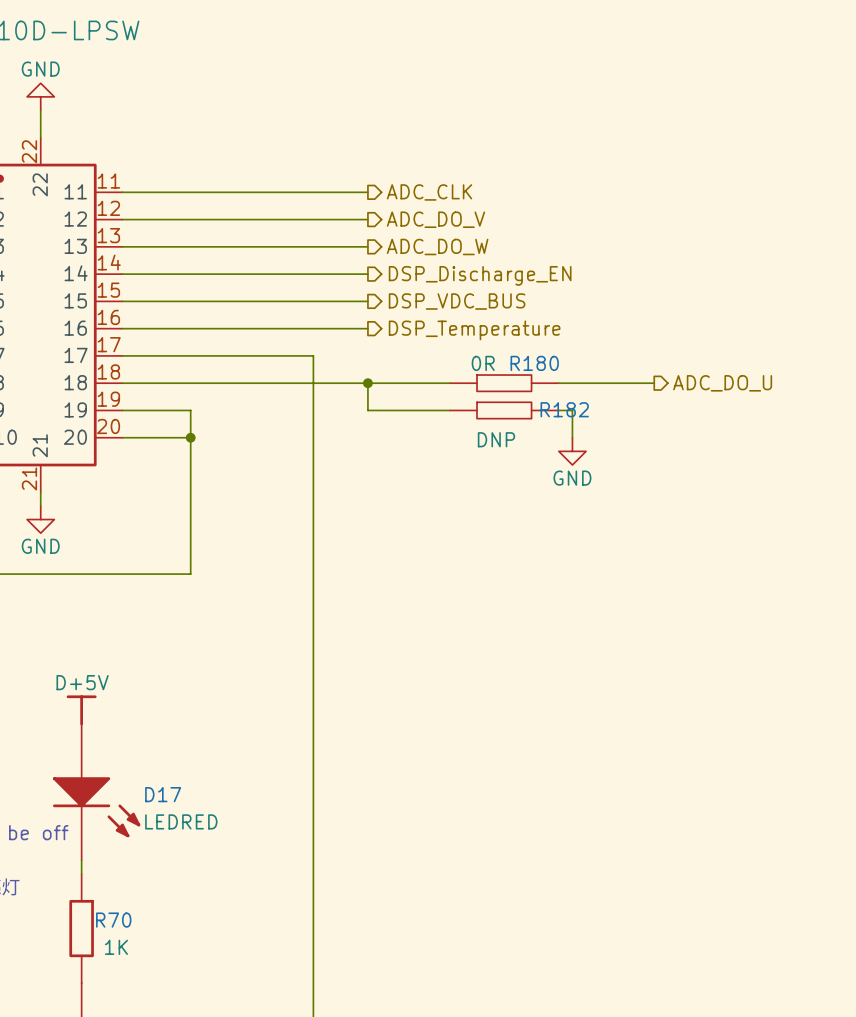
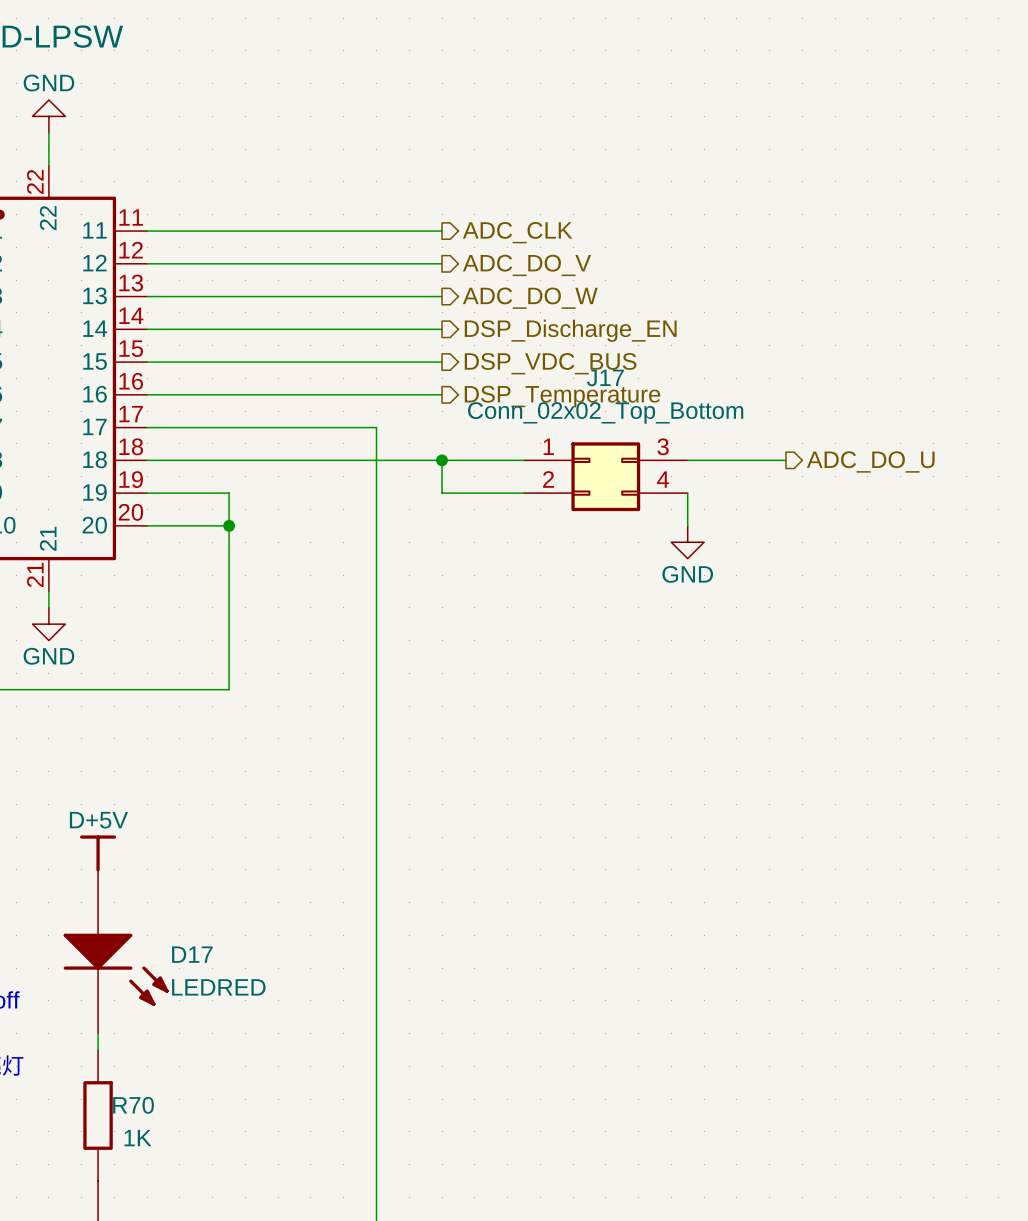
R180: 0R (504, 383) -> none
J17: none -> Conn_02x02_Top_Bottom (605, 476)
R182: DNP (504, 410) -> none

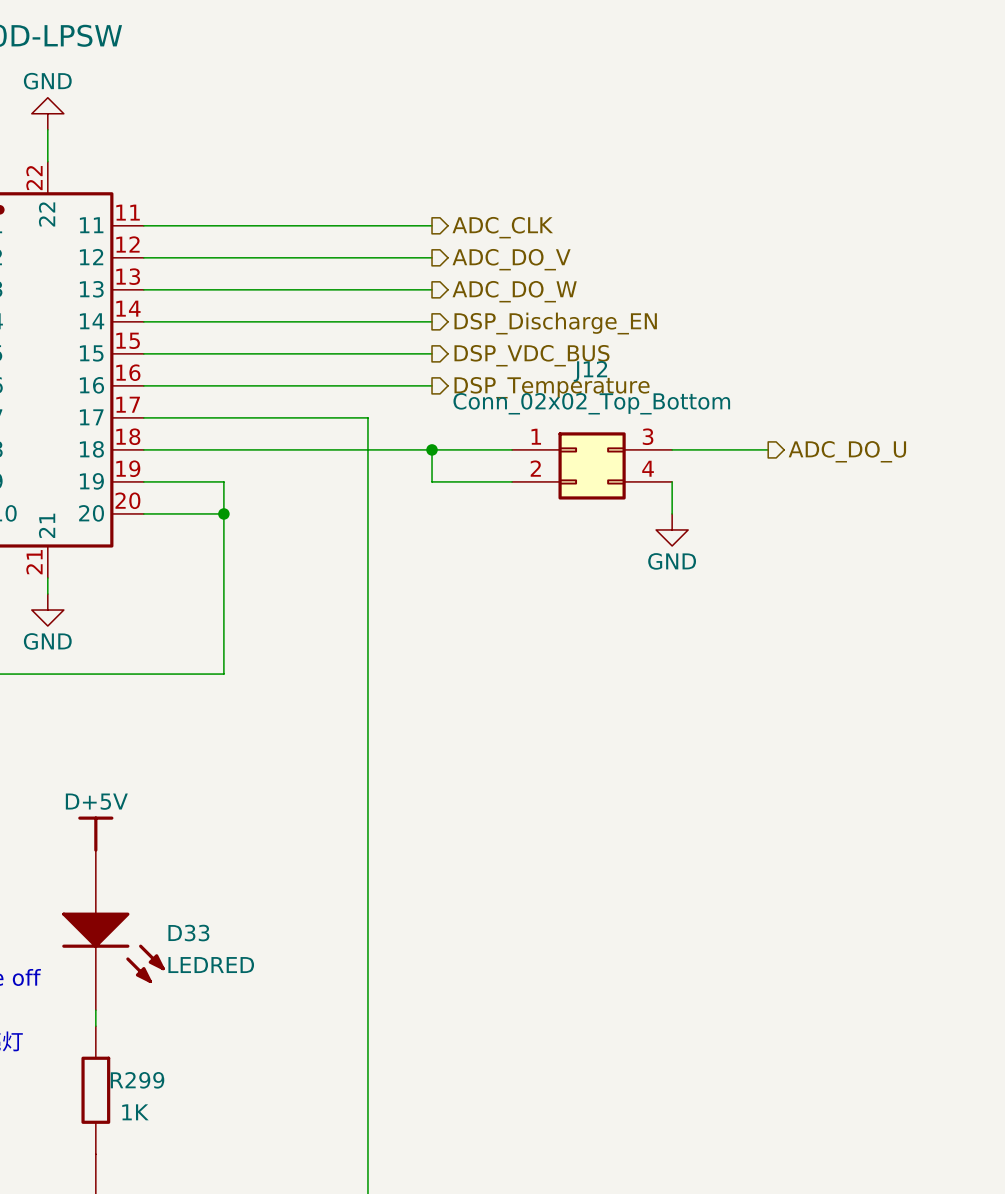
J17 name: J17 (605, 377) -> J12 (590, 371)
D17 name: D17 (192, 954) -> D33 (188, 933)
R70 name: R70 (133, 1105) -> R299 (137, 1080)

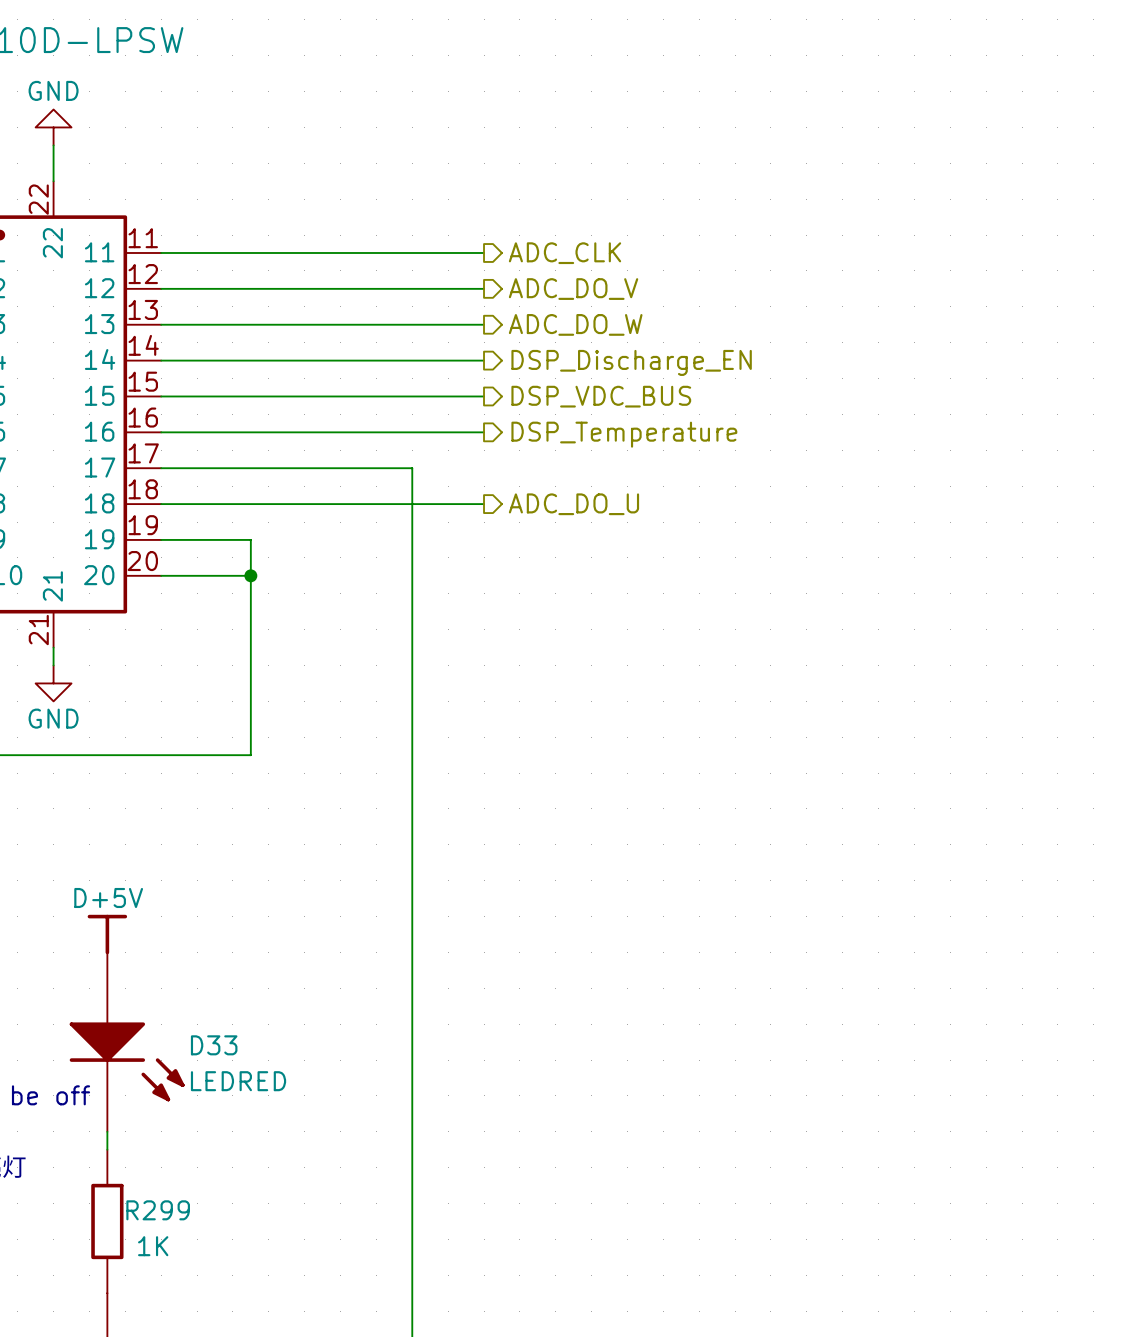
junction: (432, 449) -> none
wire: (512, 449) (432, 449) (432, 481) (512, 481) -> none
wire: (672, 449) (768, 449) -> none
hierarchical label: none -> ADC_DO_U (573, 504)
hierarchical label: ADC_DO_U (847, 451) -> none
J12: Conn_02x02_Top_Bottom (592, 465) -> none
wire: (672, 481) (672, 513) -> none
power symbol: GND (672, 529) -> none

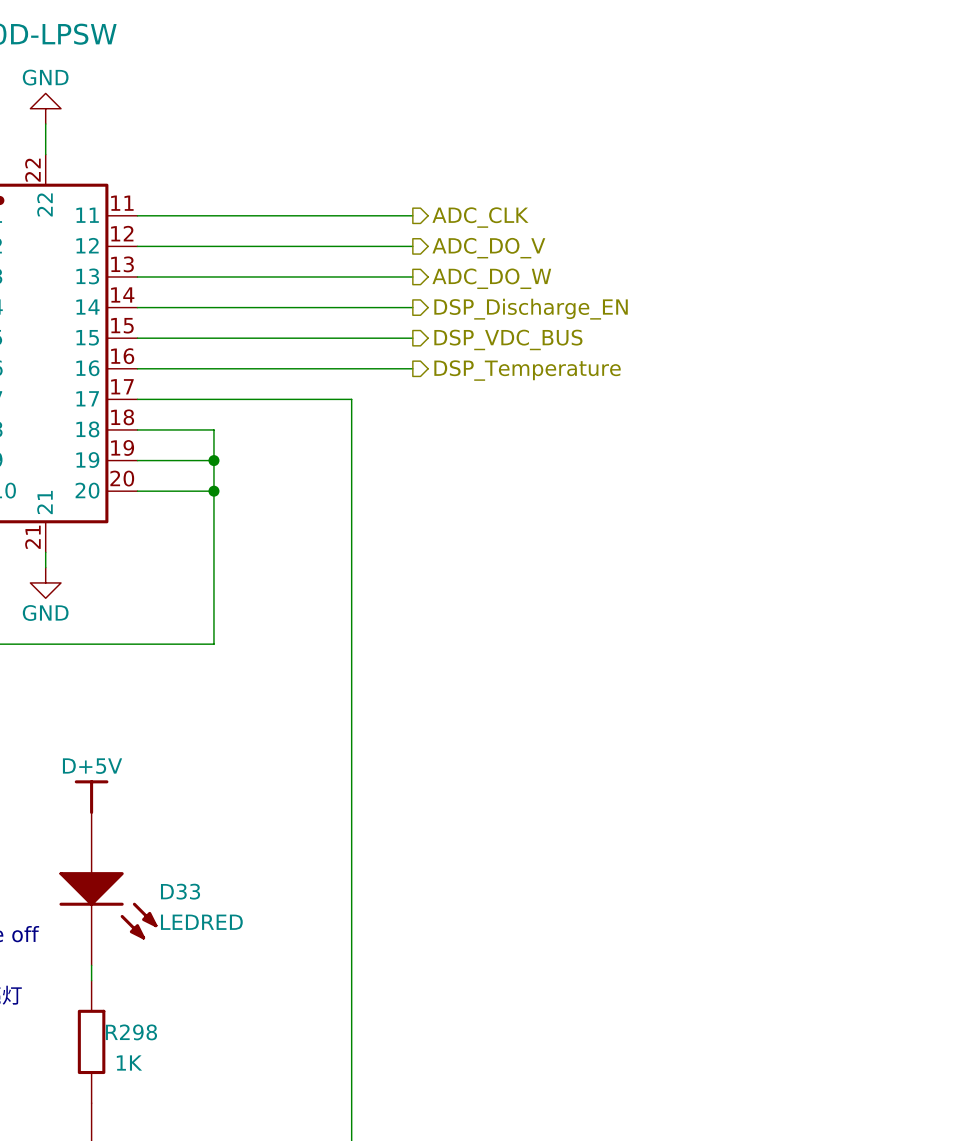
wire: (250, 504) (484, 504) -> (213, 429) (213, 460)
hierarchical label: ADC_DO_U (573, 504) -> none
junction: none -> (213, 460)
R299 name: R299 (158, 1210) -> R298 (131, 1032)

